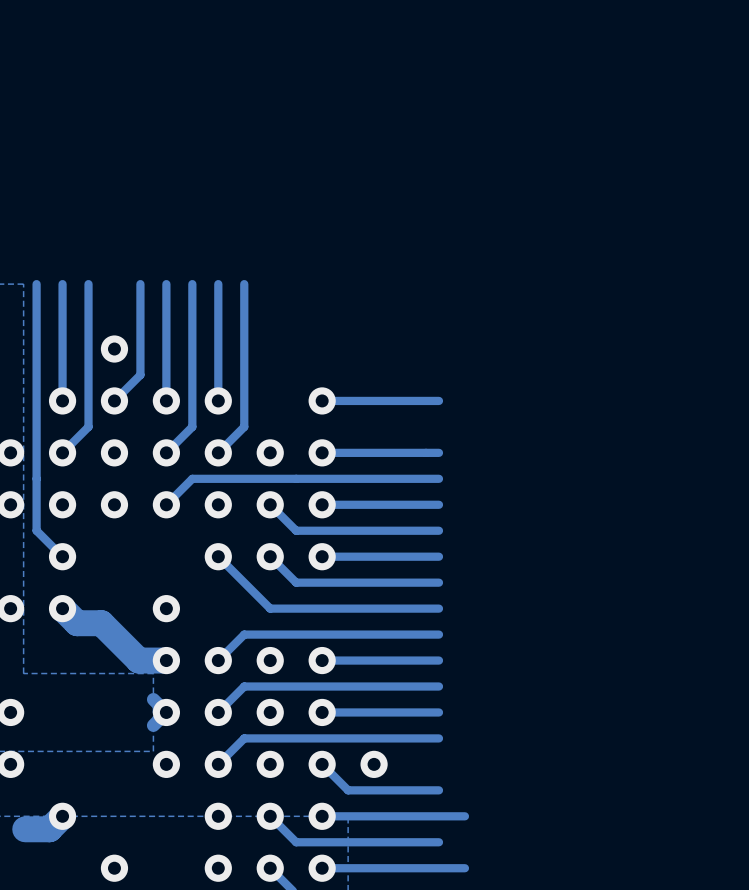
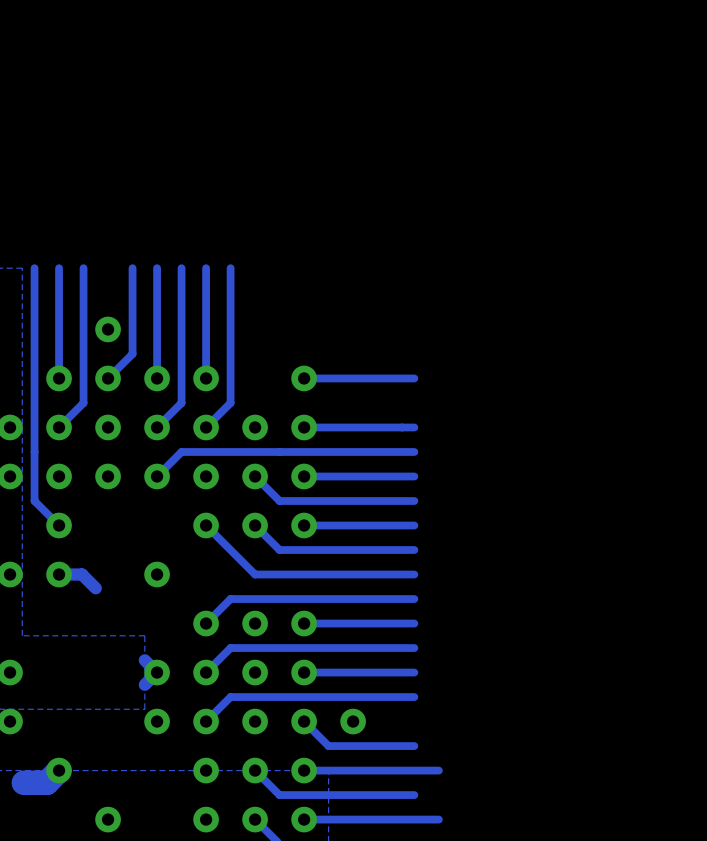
track: (62, 608) (77, 623) (101, 623) (138, 660) (166, 660) -> (59, 574) (82, 574) (95, 588)
via: (166, 660) -> none

